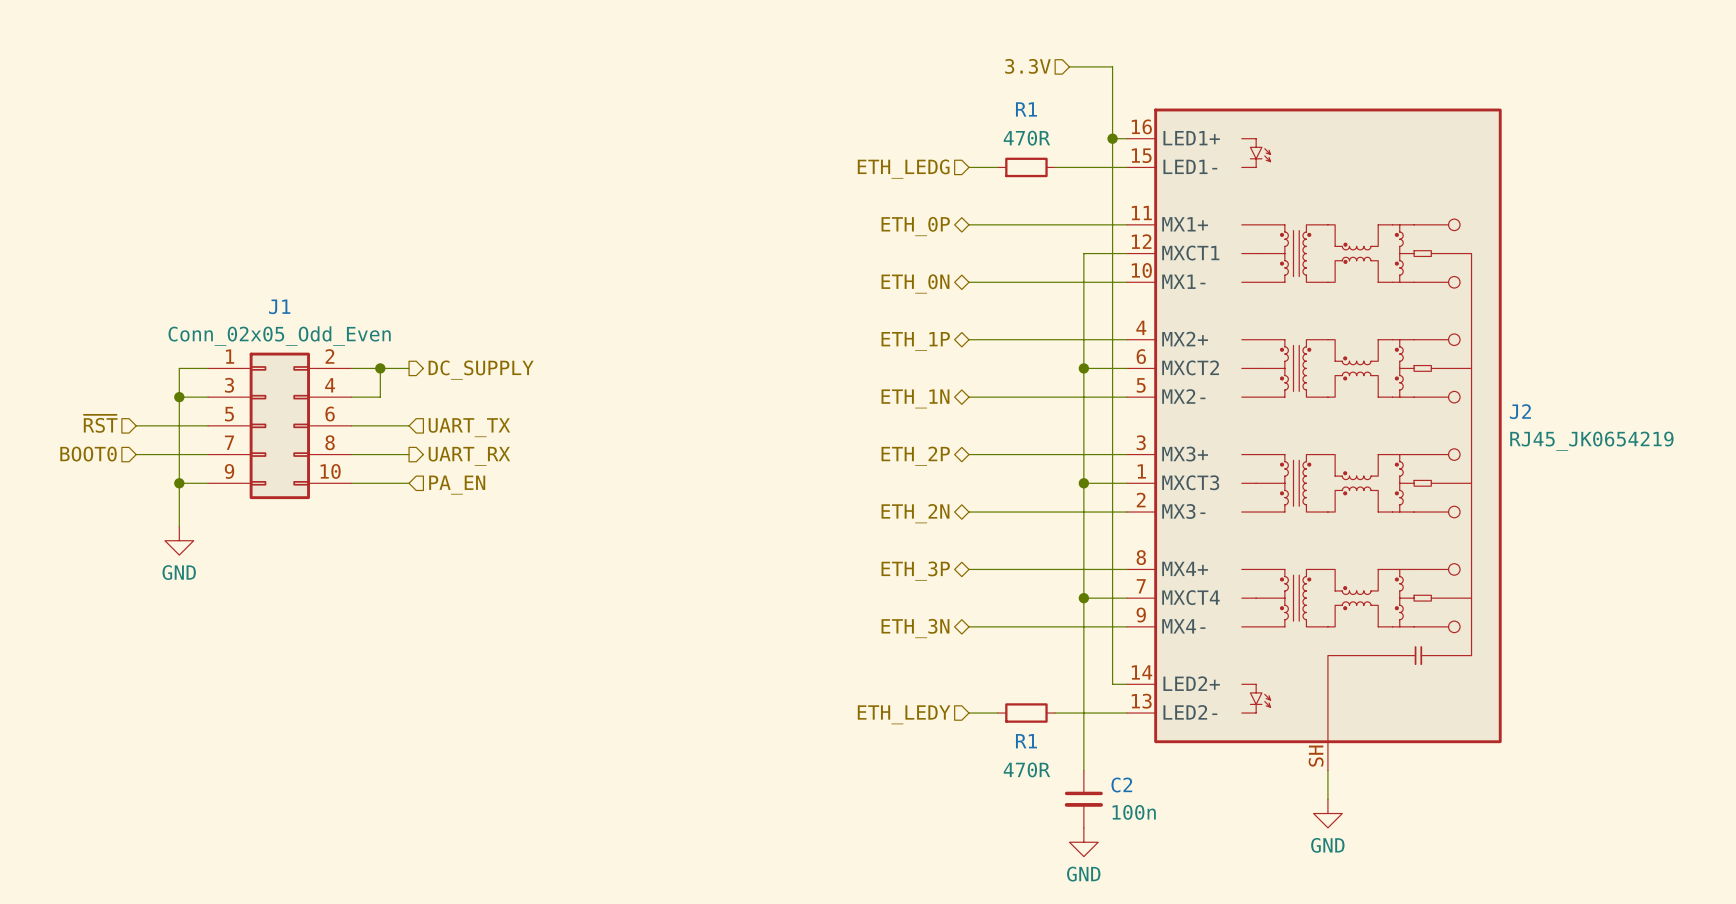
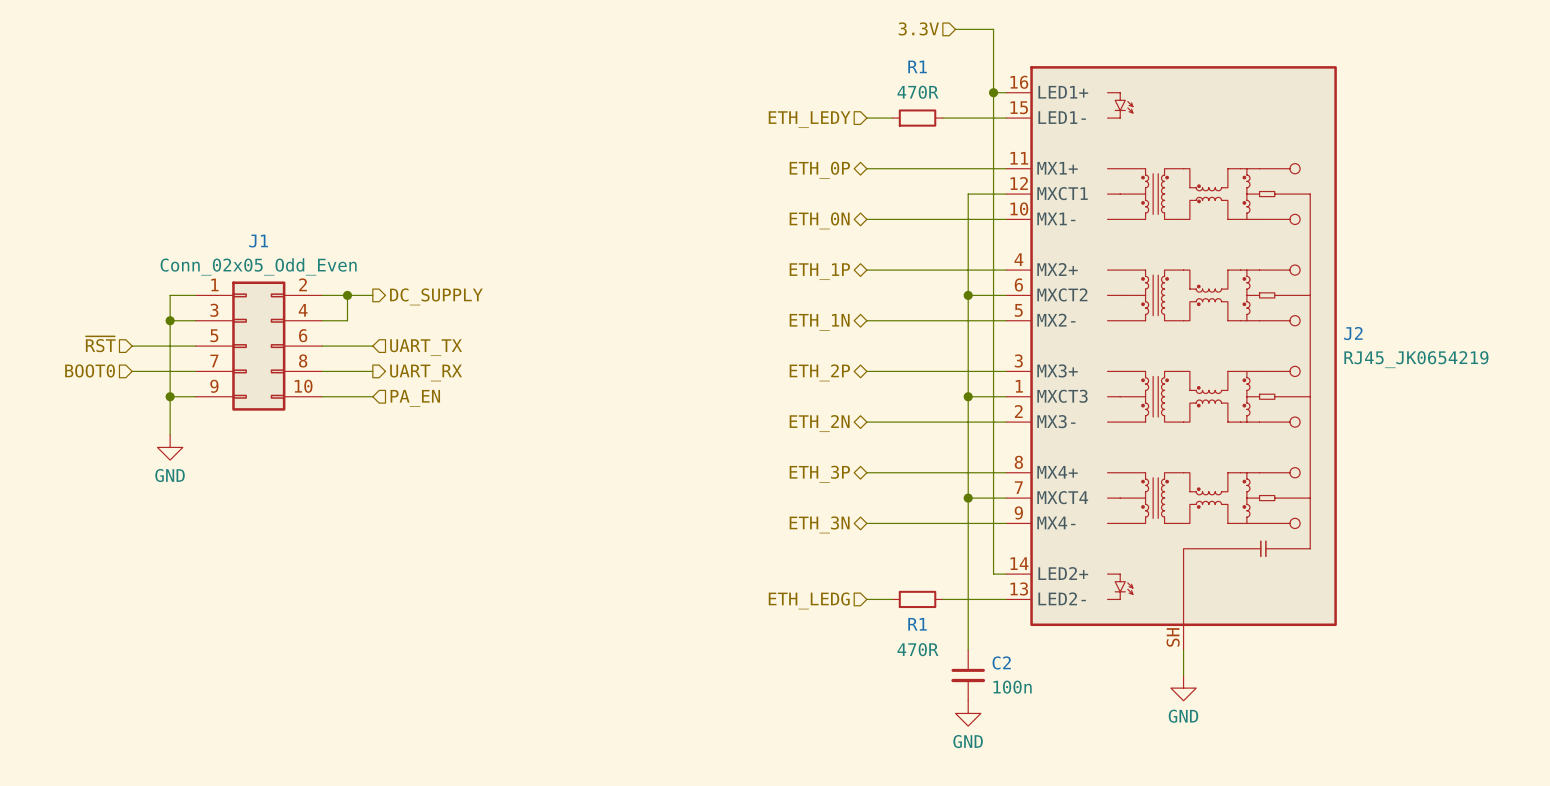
hierarchical label: ETH_LEDG (903, 169) -> ETH_LEDY (809, 119)
hierarchical label: ETH_LEDY (904, 714) -> ETH_LEDG (809, 600)

